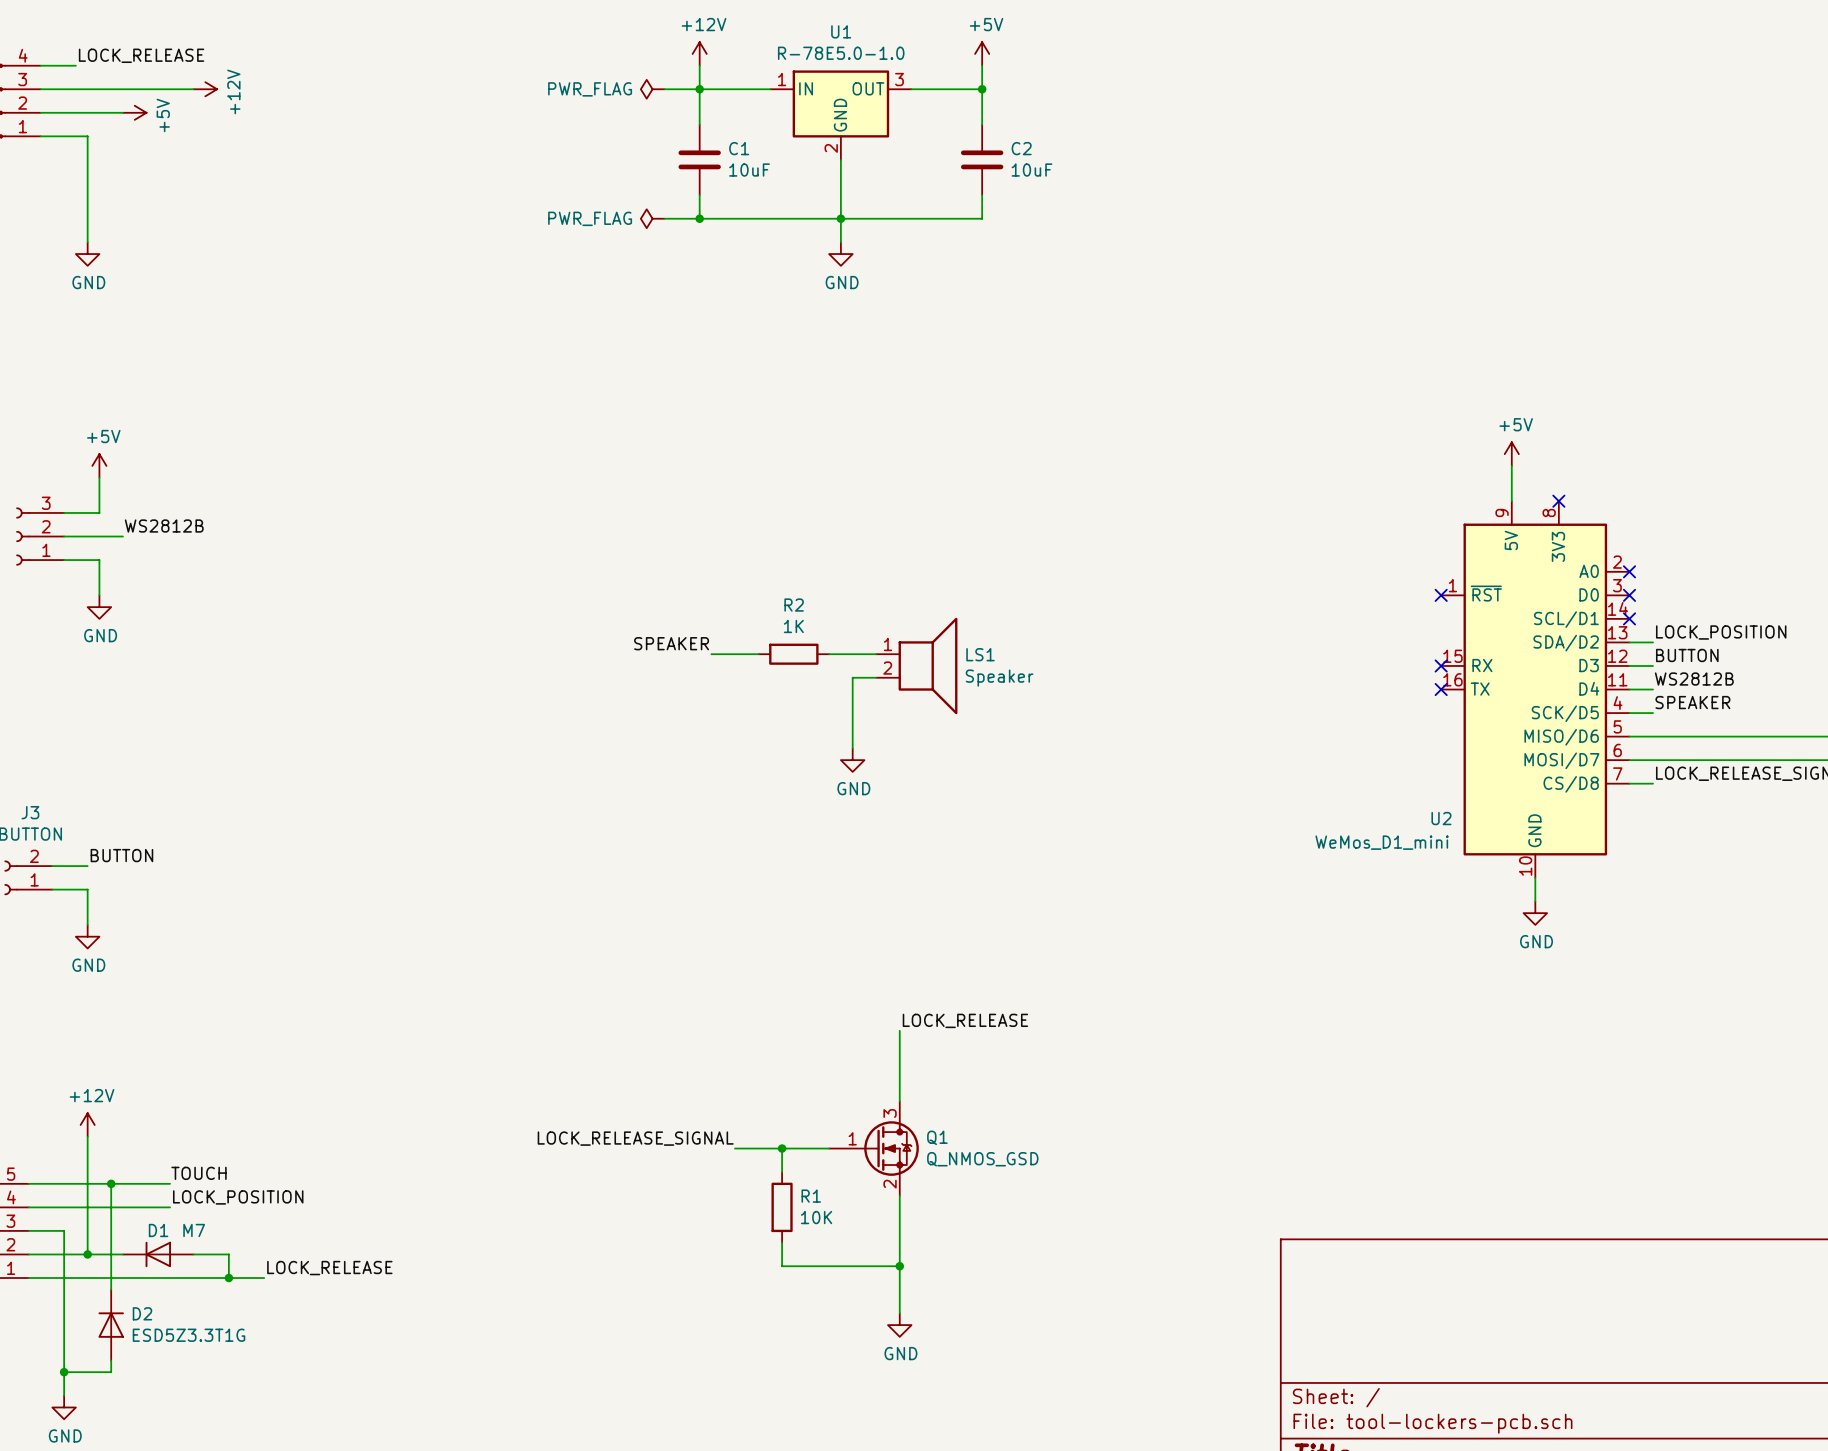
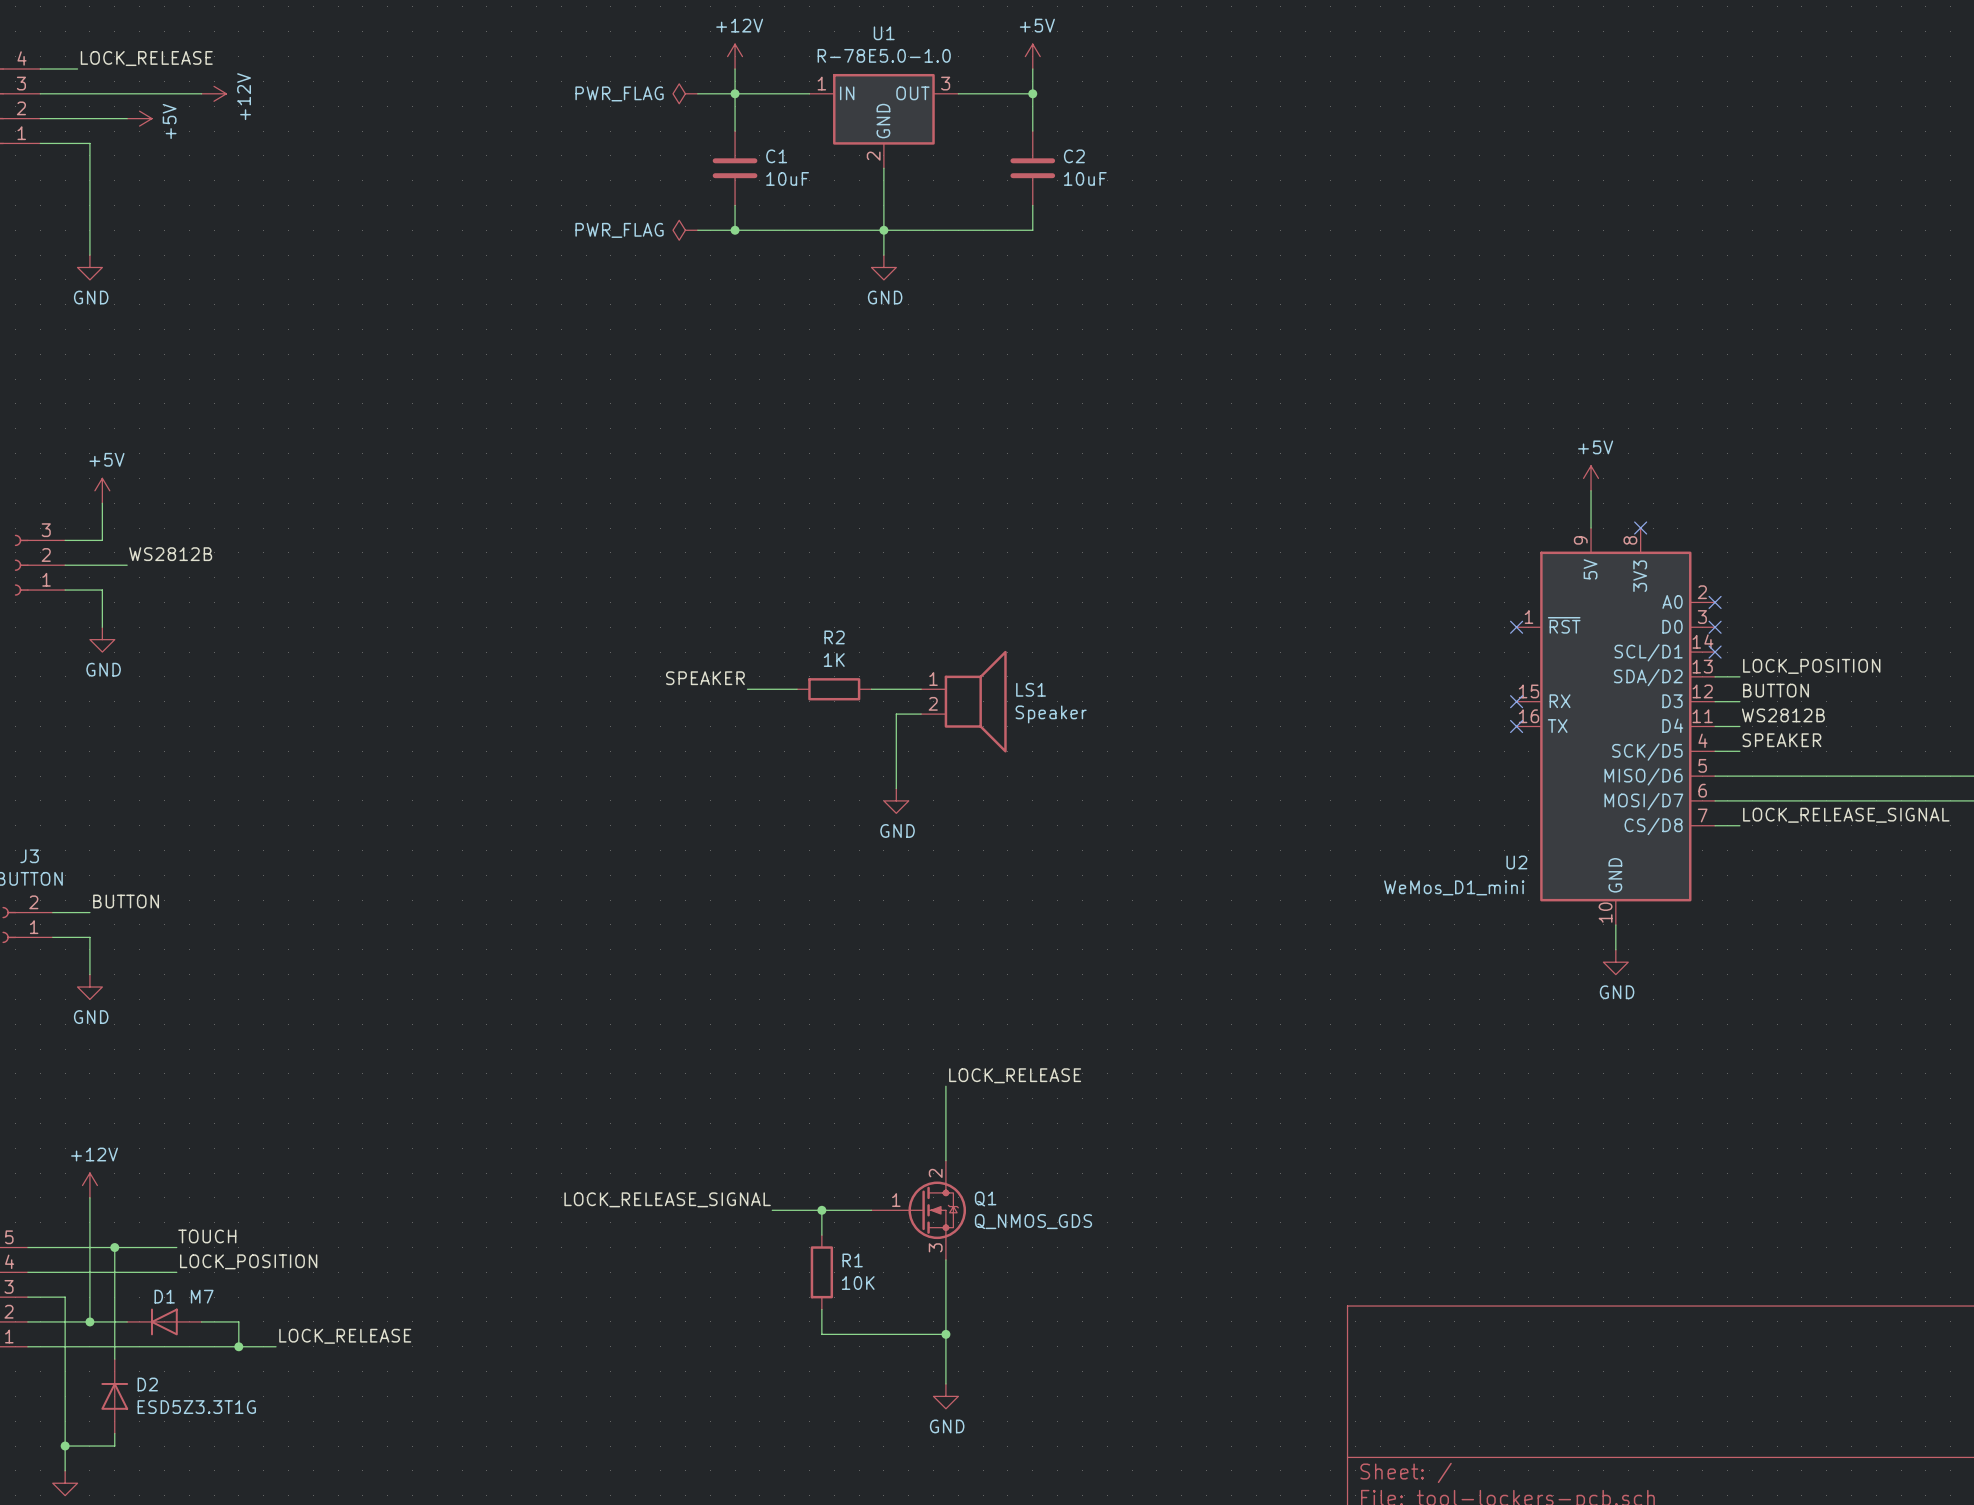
Q1 pin number: 3 (890, 1113) -> 2 (935, 1173)
Q1 value: Q_NMOS_GSD (982, 1159) -> Q_NMOS_GDS (1033, 1221)
Q1 pin number: 2 (890, 1184) -> 3 (935, 1247)

